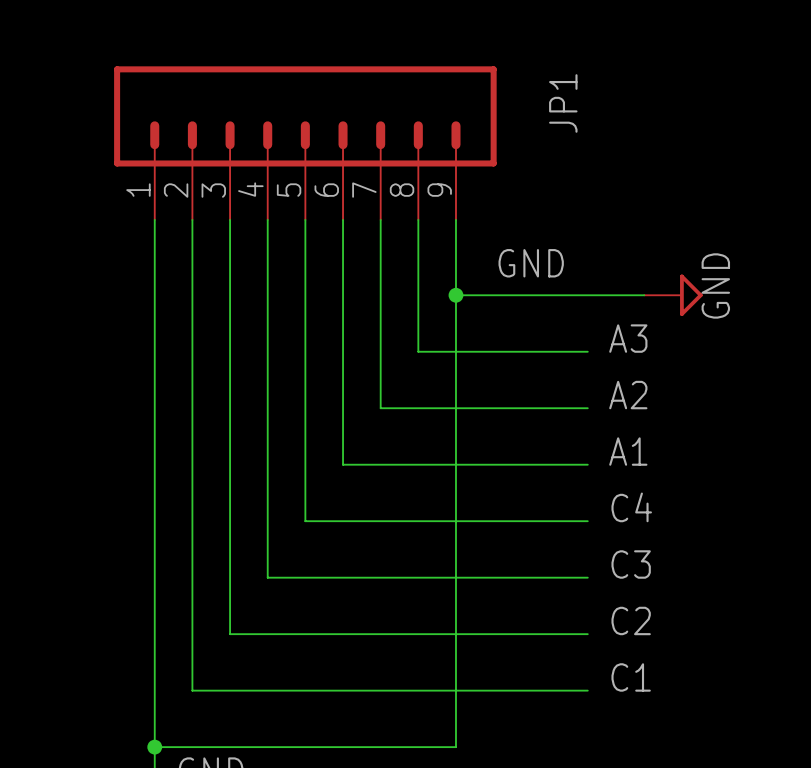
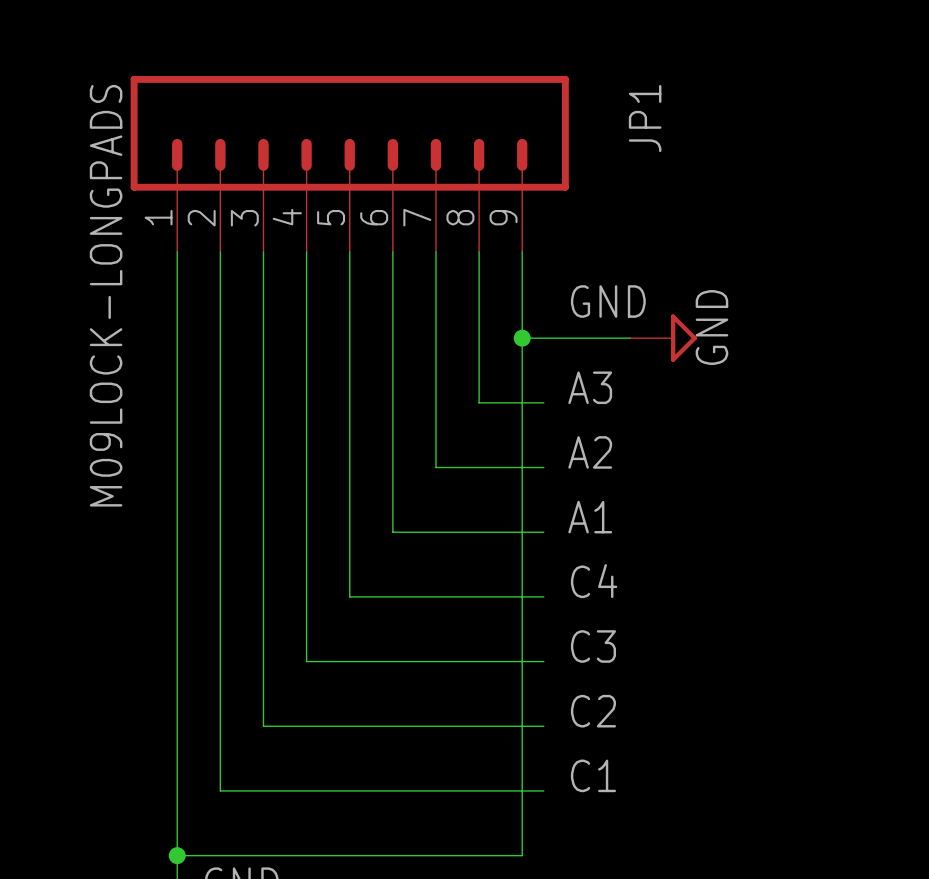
JP1 value: none -> M09LOCK-LONGPADS (106, 295)
wire: (550, 295) (644, 295) -> none
power symbol position: GND (673, 295) -> GND (663, 338)
label position: A3 (628, 338) -> A3 (590, 387)
wire: (474, 351) (587, 351) -> none
label position: A2 (628, 395) -> A2 (590, 452)
wire: (474, 408) (587, 408) -> none
label position: A1 (628, 451) -> A1 (590, 517)
wire: (474, 464) (587, 464) -> none
label position: C4 (631, 507) -> C4 (594, 581)
wire: (474, 521) (587, 521) -> none
label position: C3 (631, 564) -> C3 (593, 646)
wire: (474, 577) (587, 577) -> none
label position: C2 (631, 620) -> C2 (593, 711)
wire: (474, 634) (587, 634) -> none
label position: C1 (631, 677) -> C1 (593, 775)
wire: (474, 690) (587, 690) -> none

